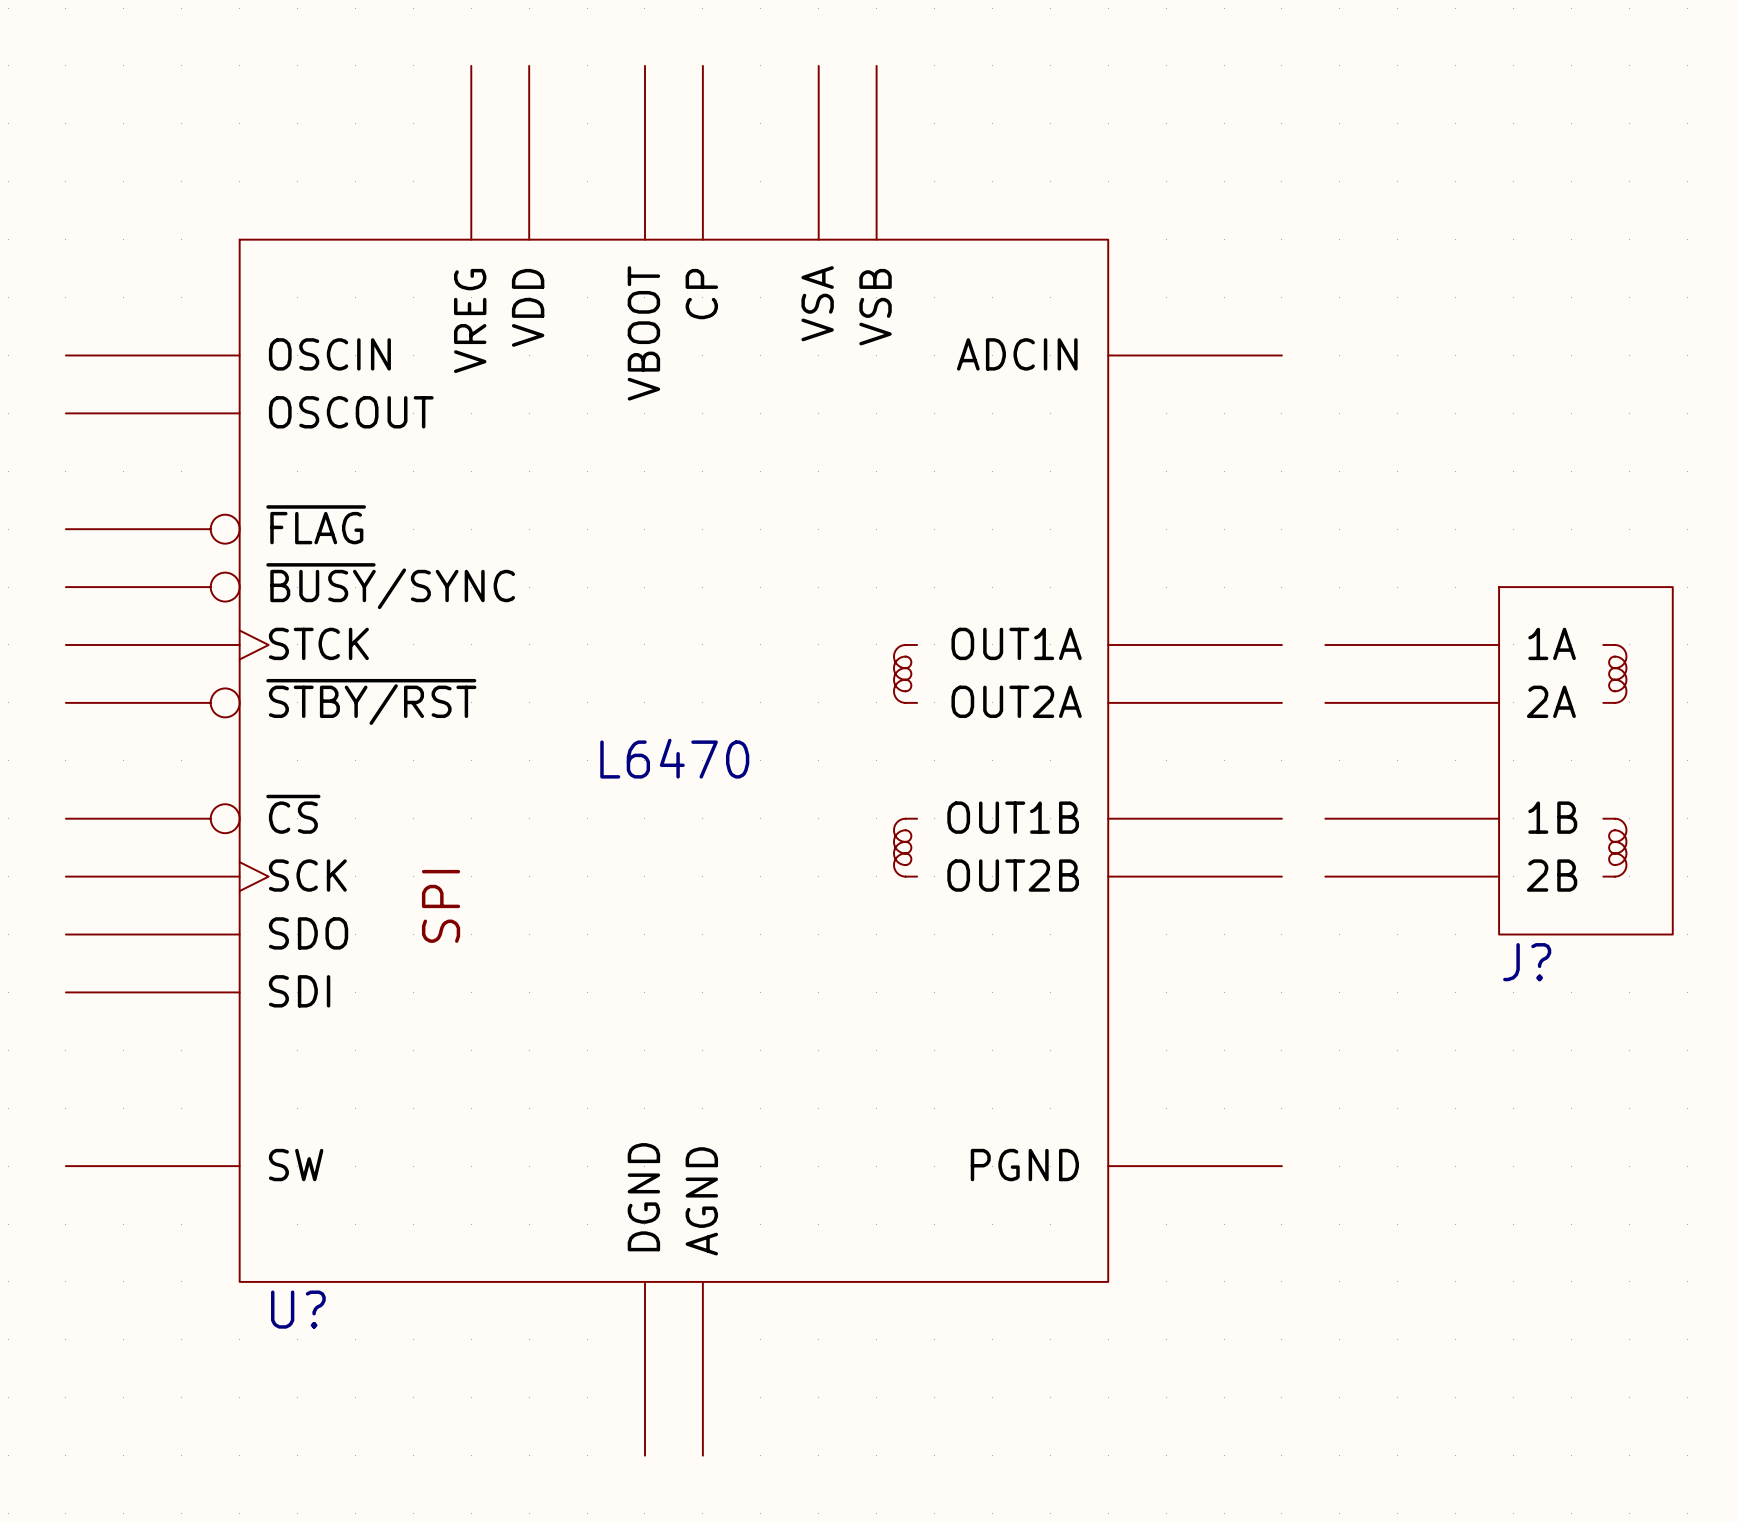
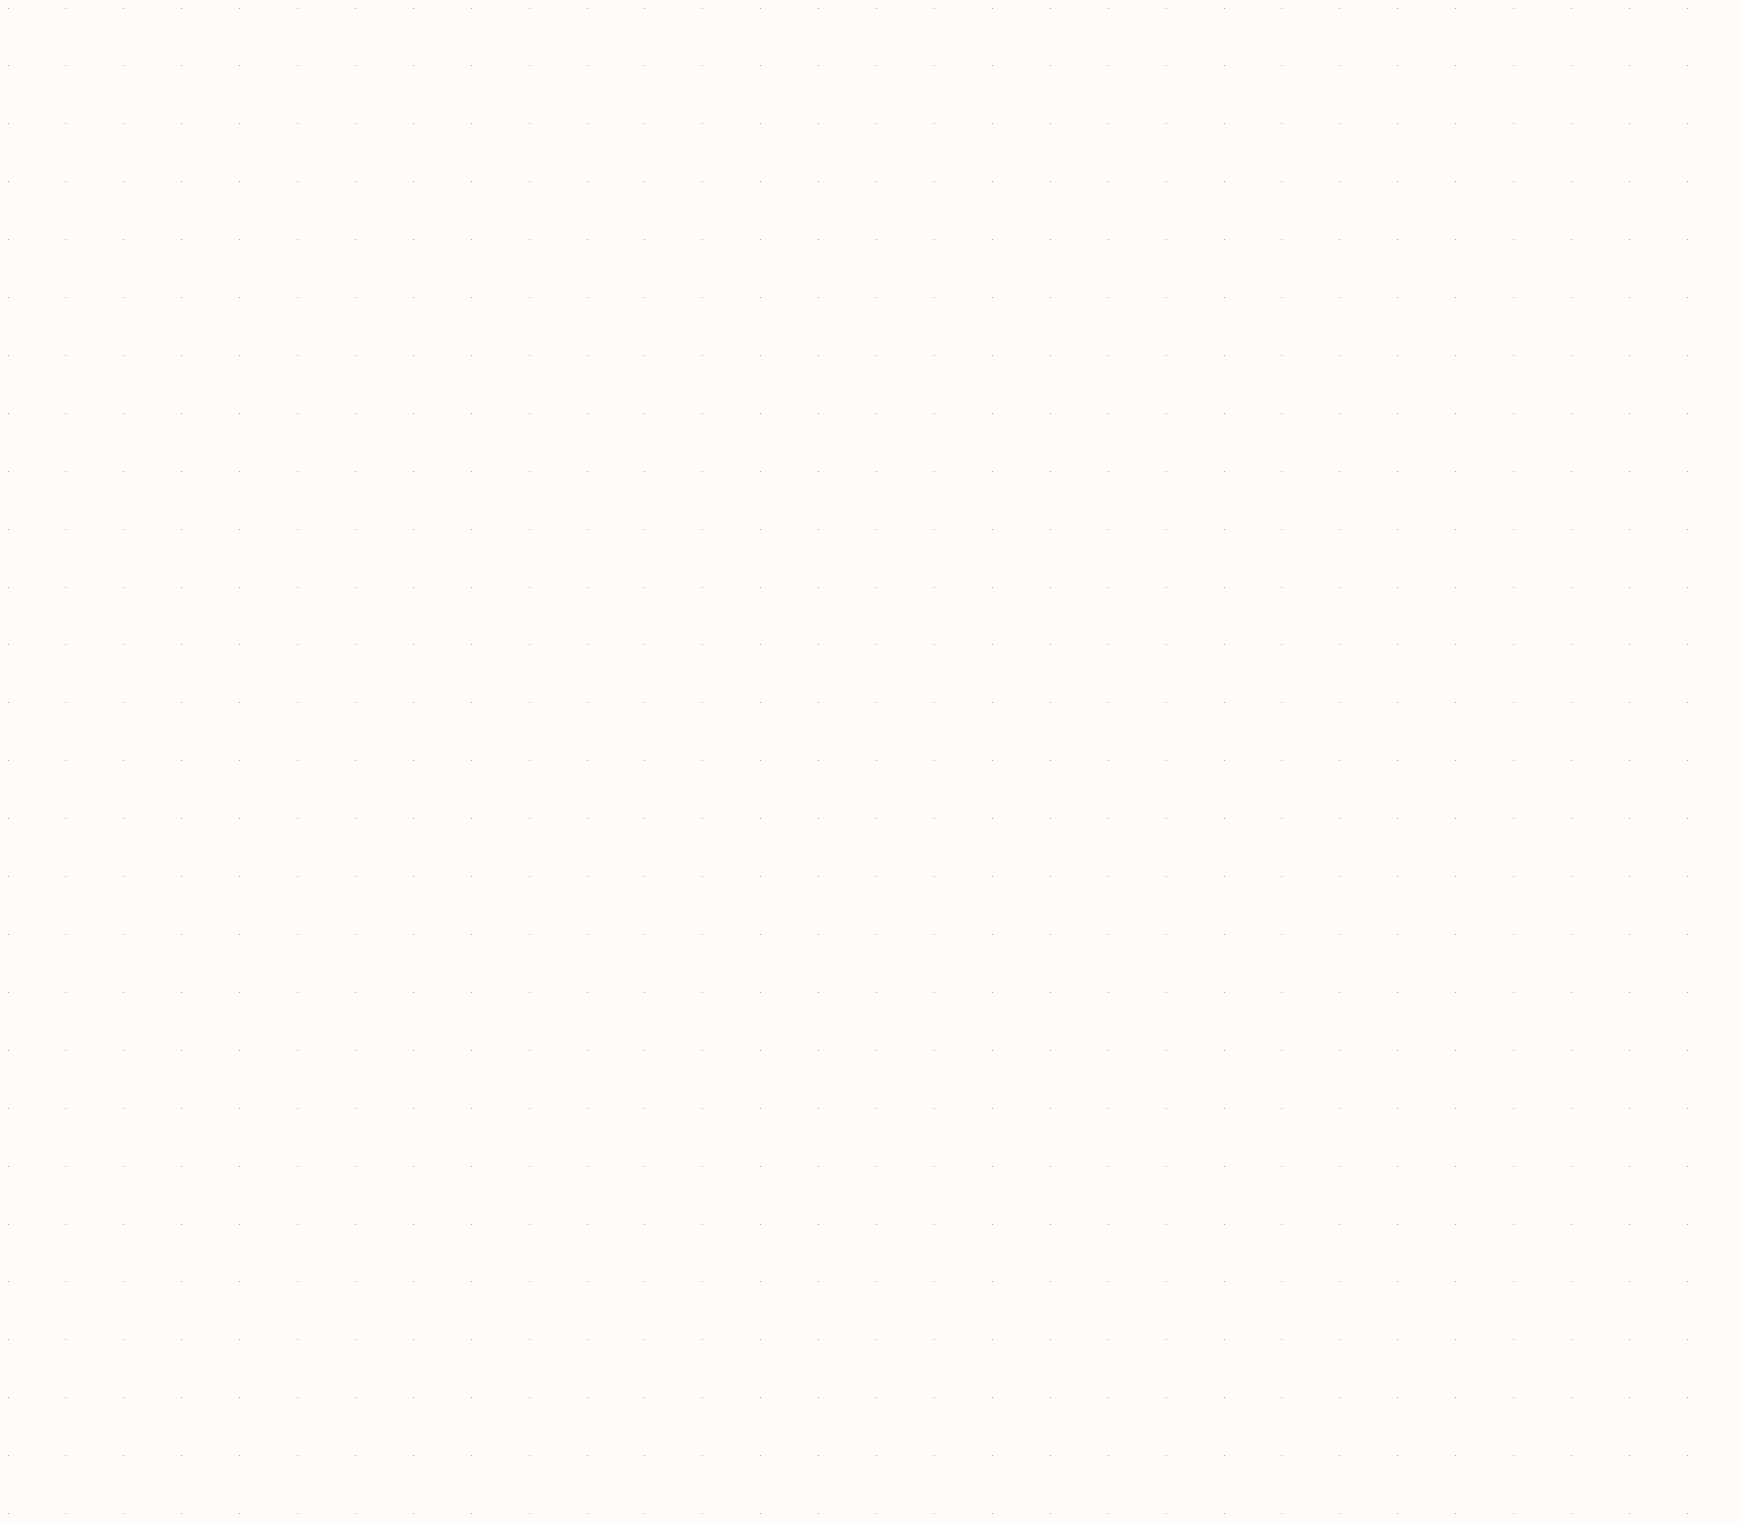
U?: L6470 (673, 760) -> none
J?: (1499, 760) -> none

